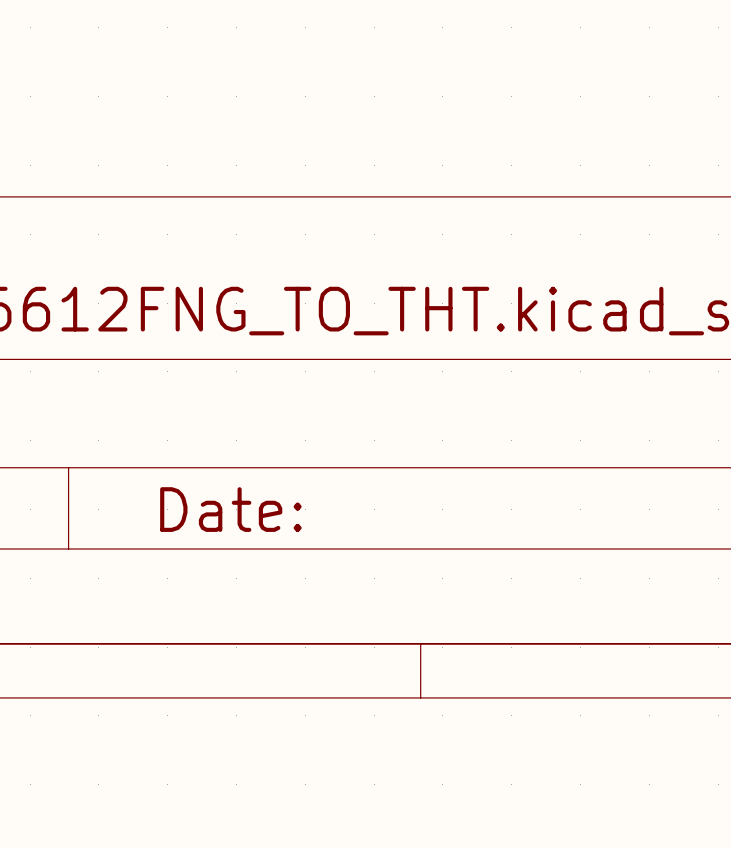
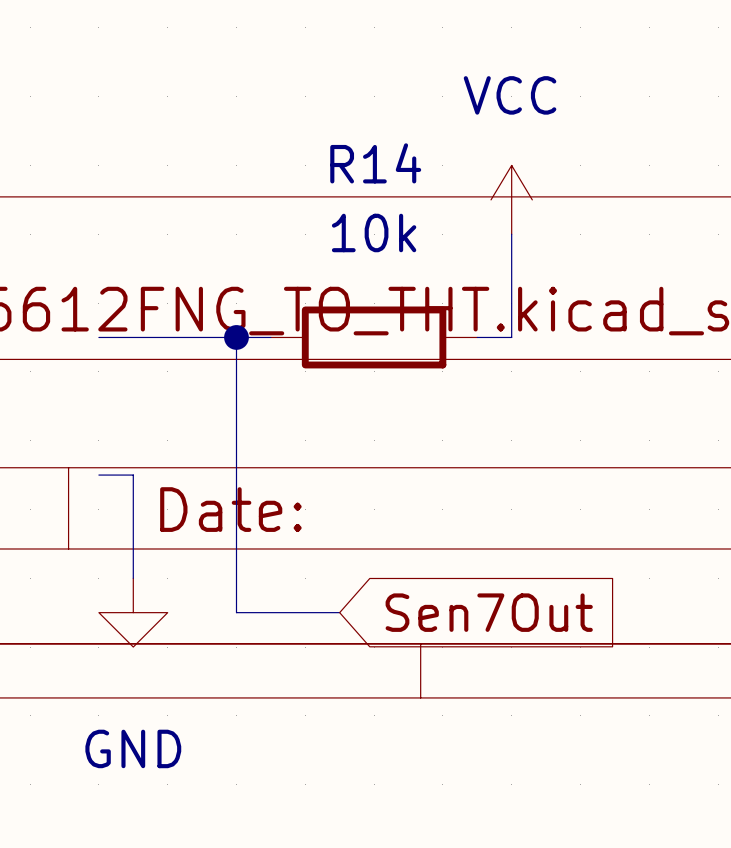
power symbol: none -> VCC (511, 199)
wire: none -> (511, 234) (511, 337) (477, 337)
wire: none -> (98, 337) (270, 337)
wire: none -> (236, 337) (236, 612) (339, 612)
junction: none -> (236, 337)
R14: none -> 10k (374, 337)
wire: none -> (98, 475) (133, 475) (133, 578)
power symbol: none -> GND (133, 612)
global label: none -> Sen7Out (489, 612)

